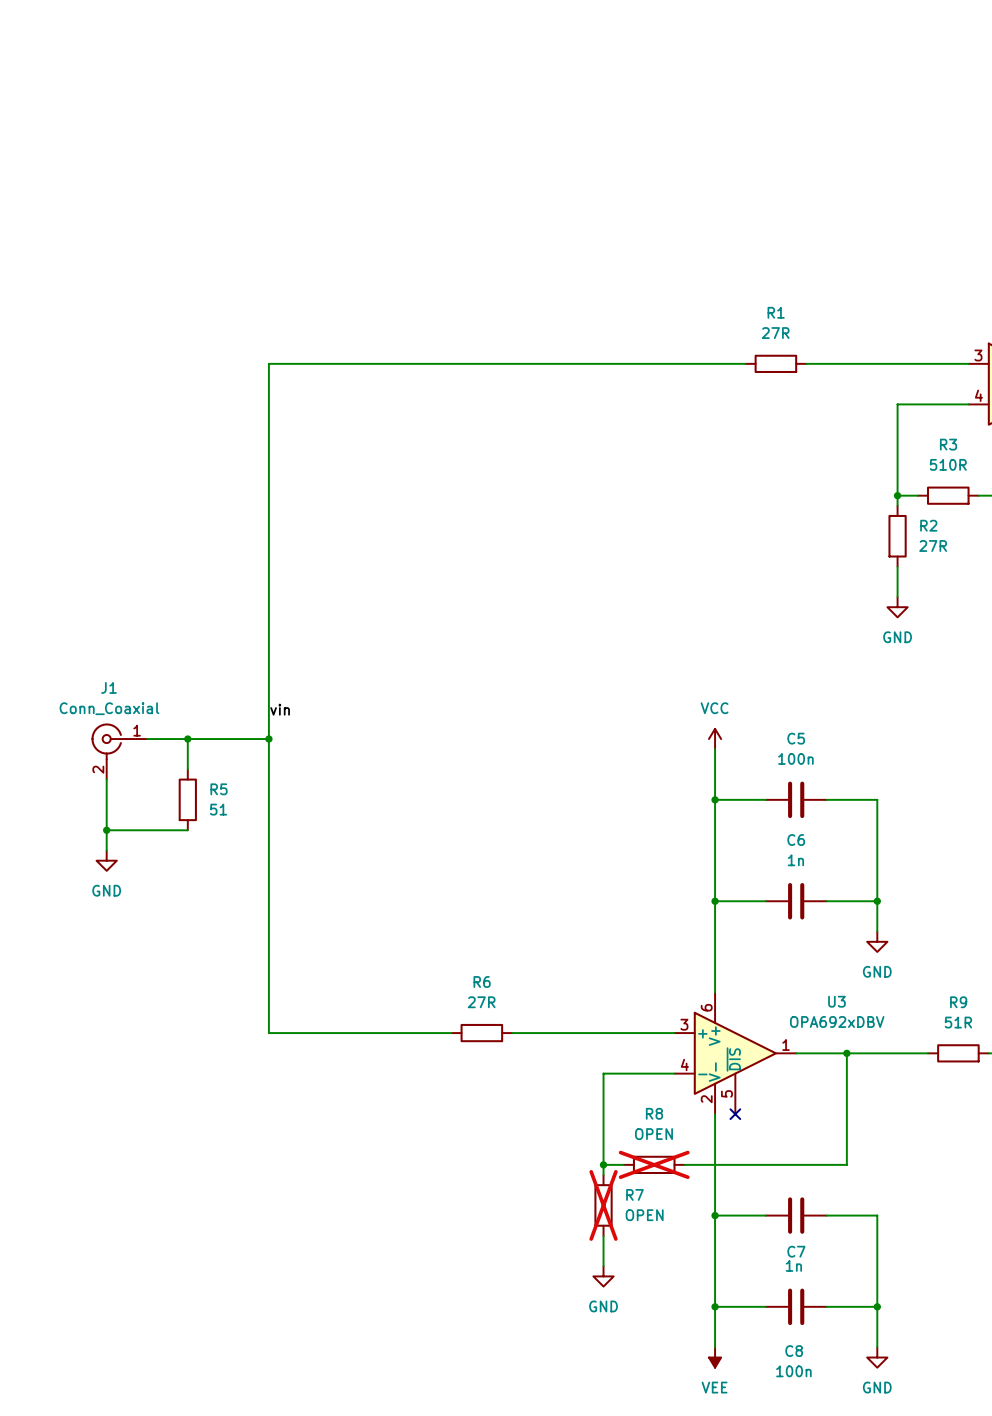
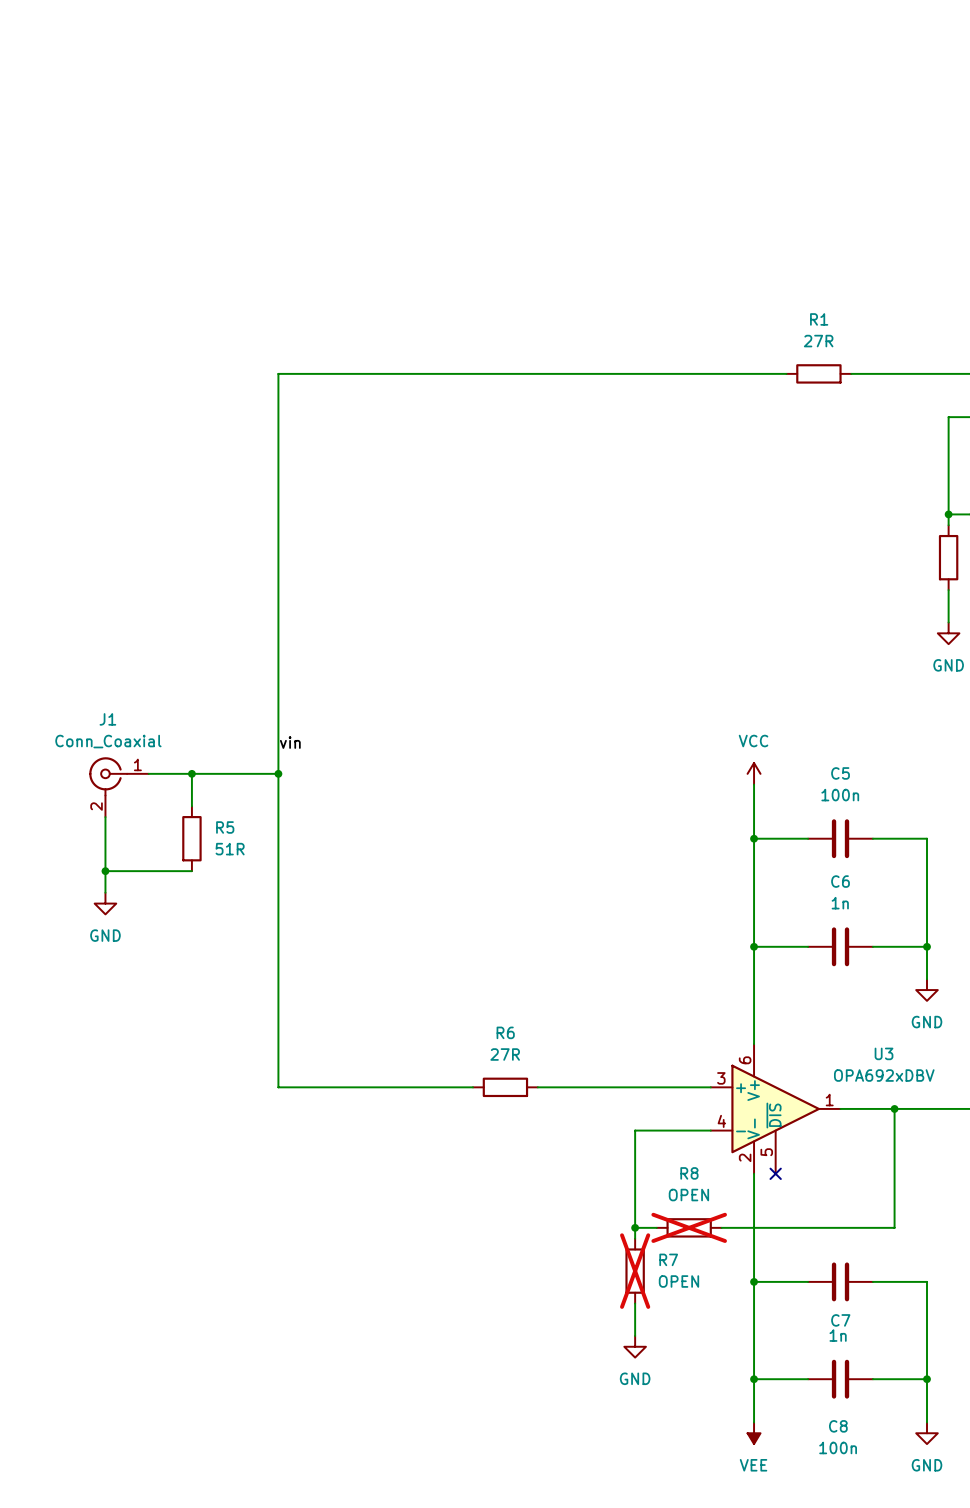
R5 value: 51 (218, 809) -> 51R (230, 849)

